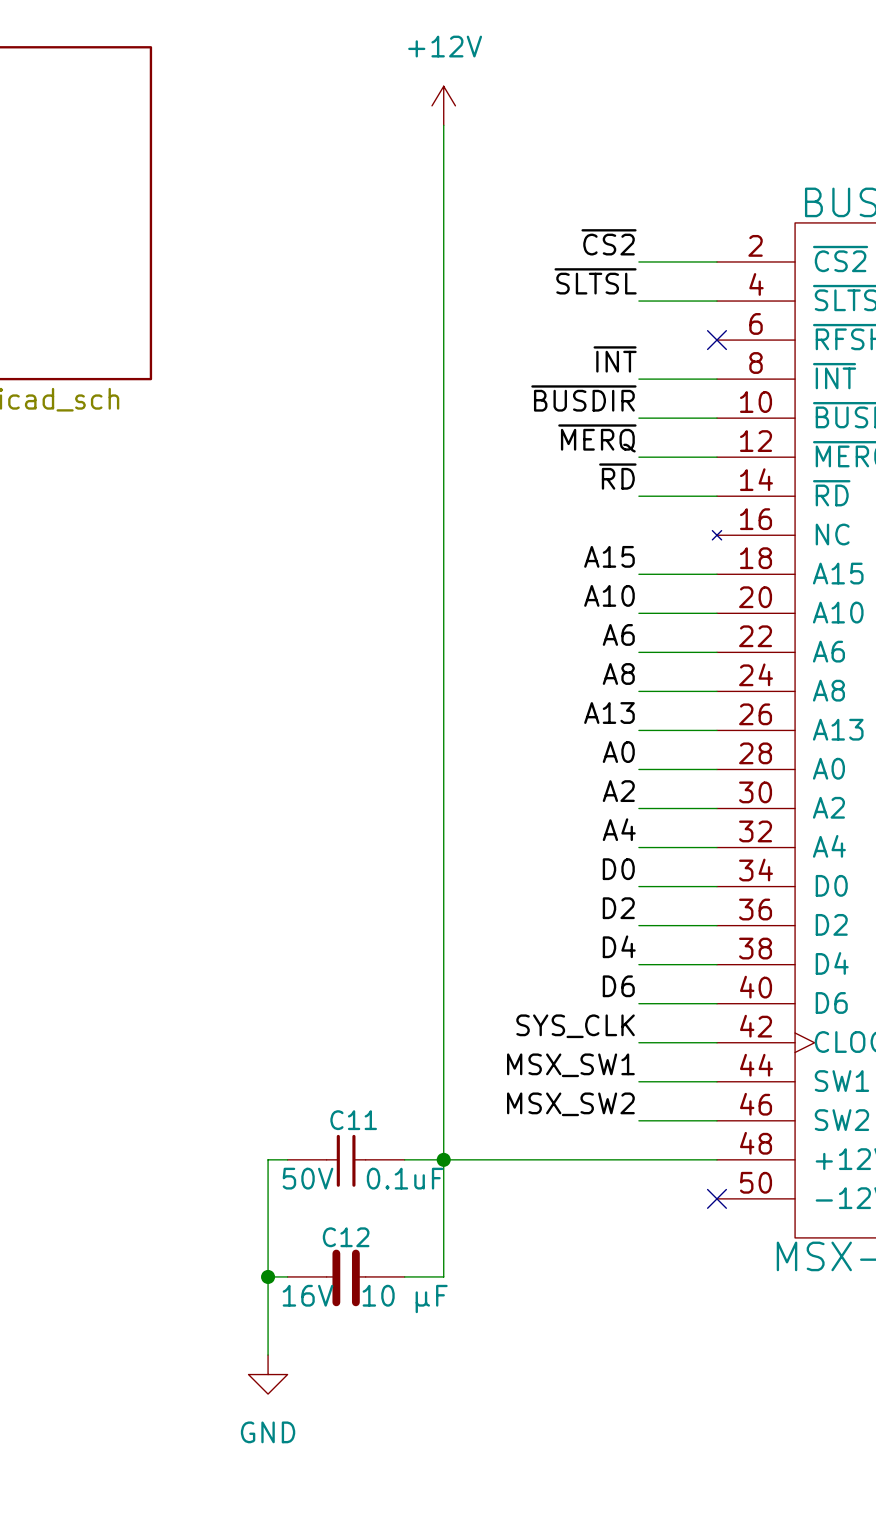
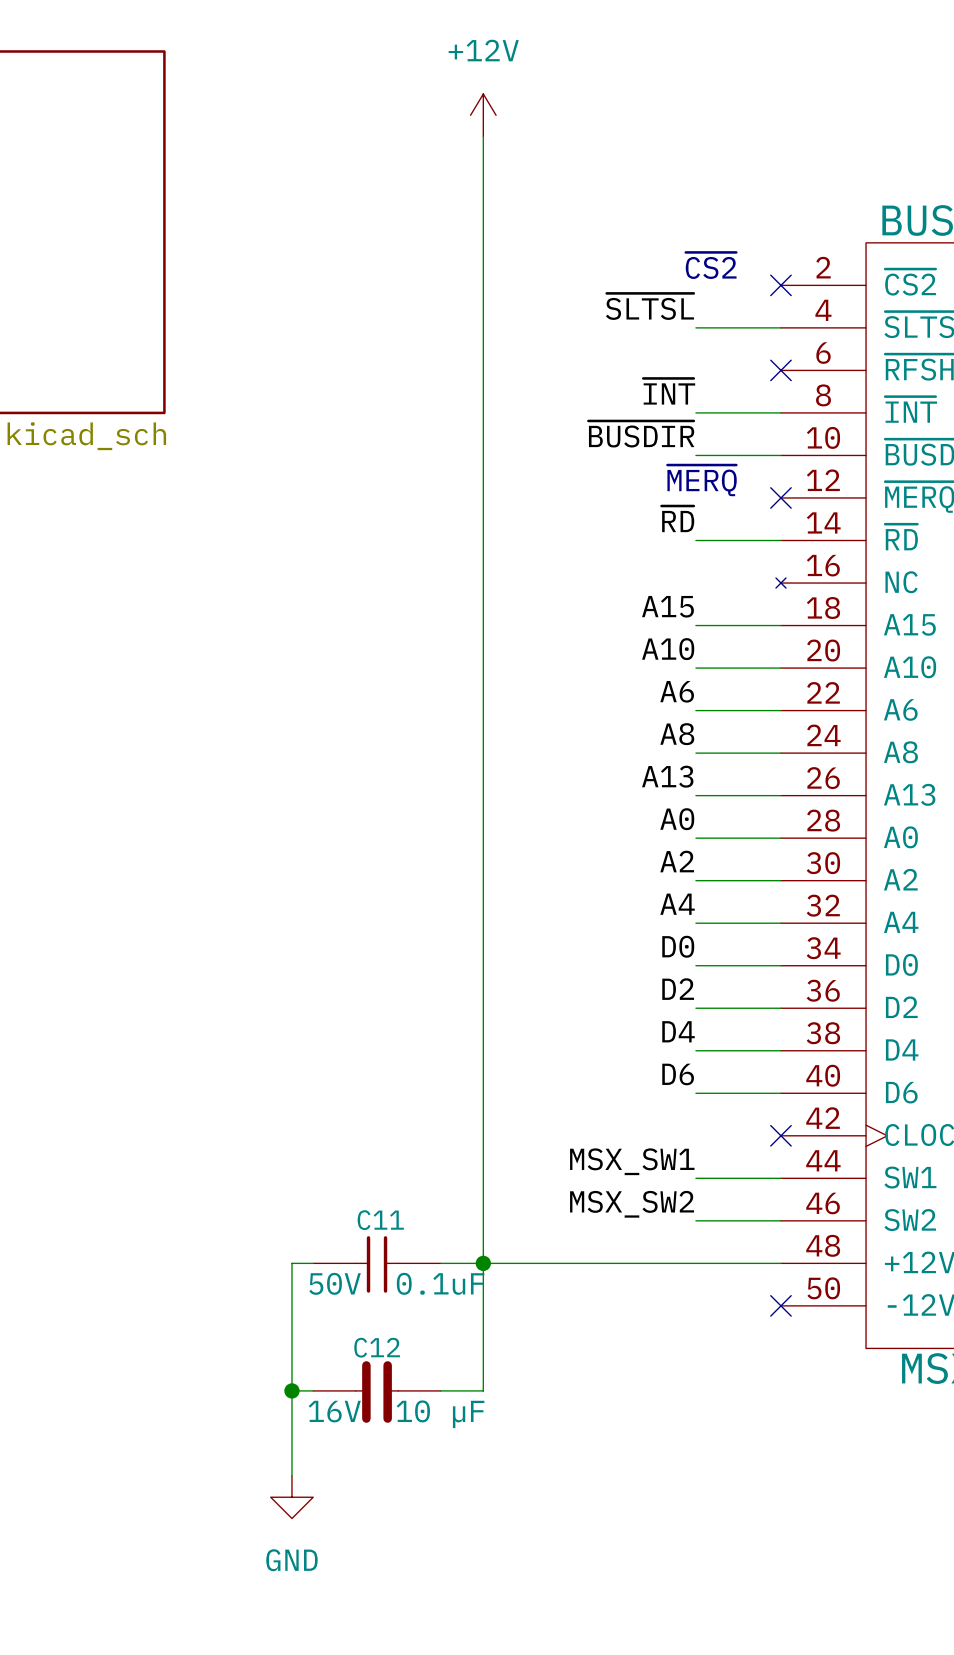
label: ~{CS2} (609, 242) -> none
text: none -> ~{CS2} (711, 265)
wire: (638, 261) (716, 261) -> none
no-connect mark: none -> (780, 285)
label: ~{MERQ} (597, 438) -> none
text: none -> ~{MERQ} (702, 480)
wire: (638, 457) (716, 457) -> none
no-connect mark: none -> (780, 497)
label: SYS_CLK (575, 1026) -> none
wire: (638, 1042) (716, 1042) -> none
no-connect mark: none -> (780, 1135)

